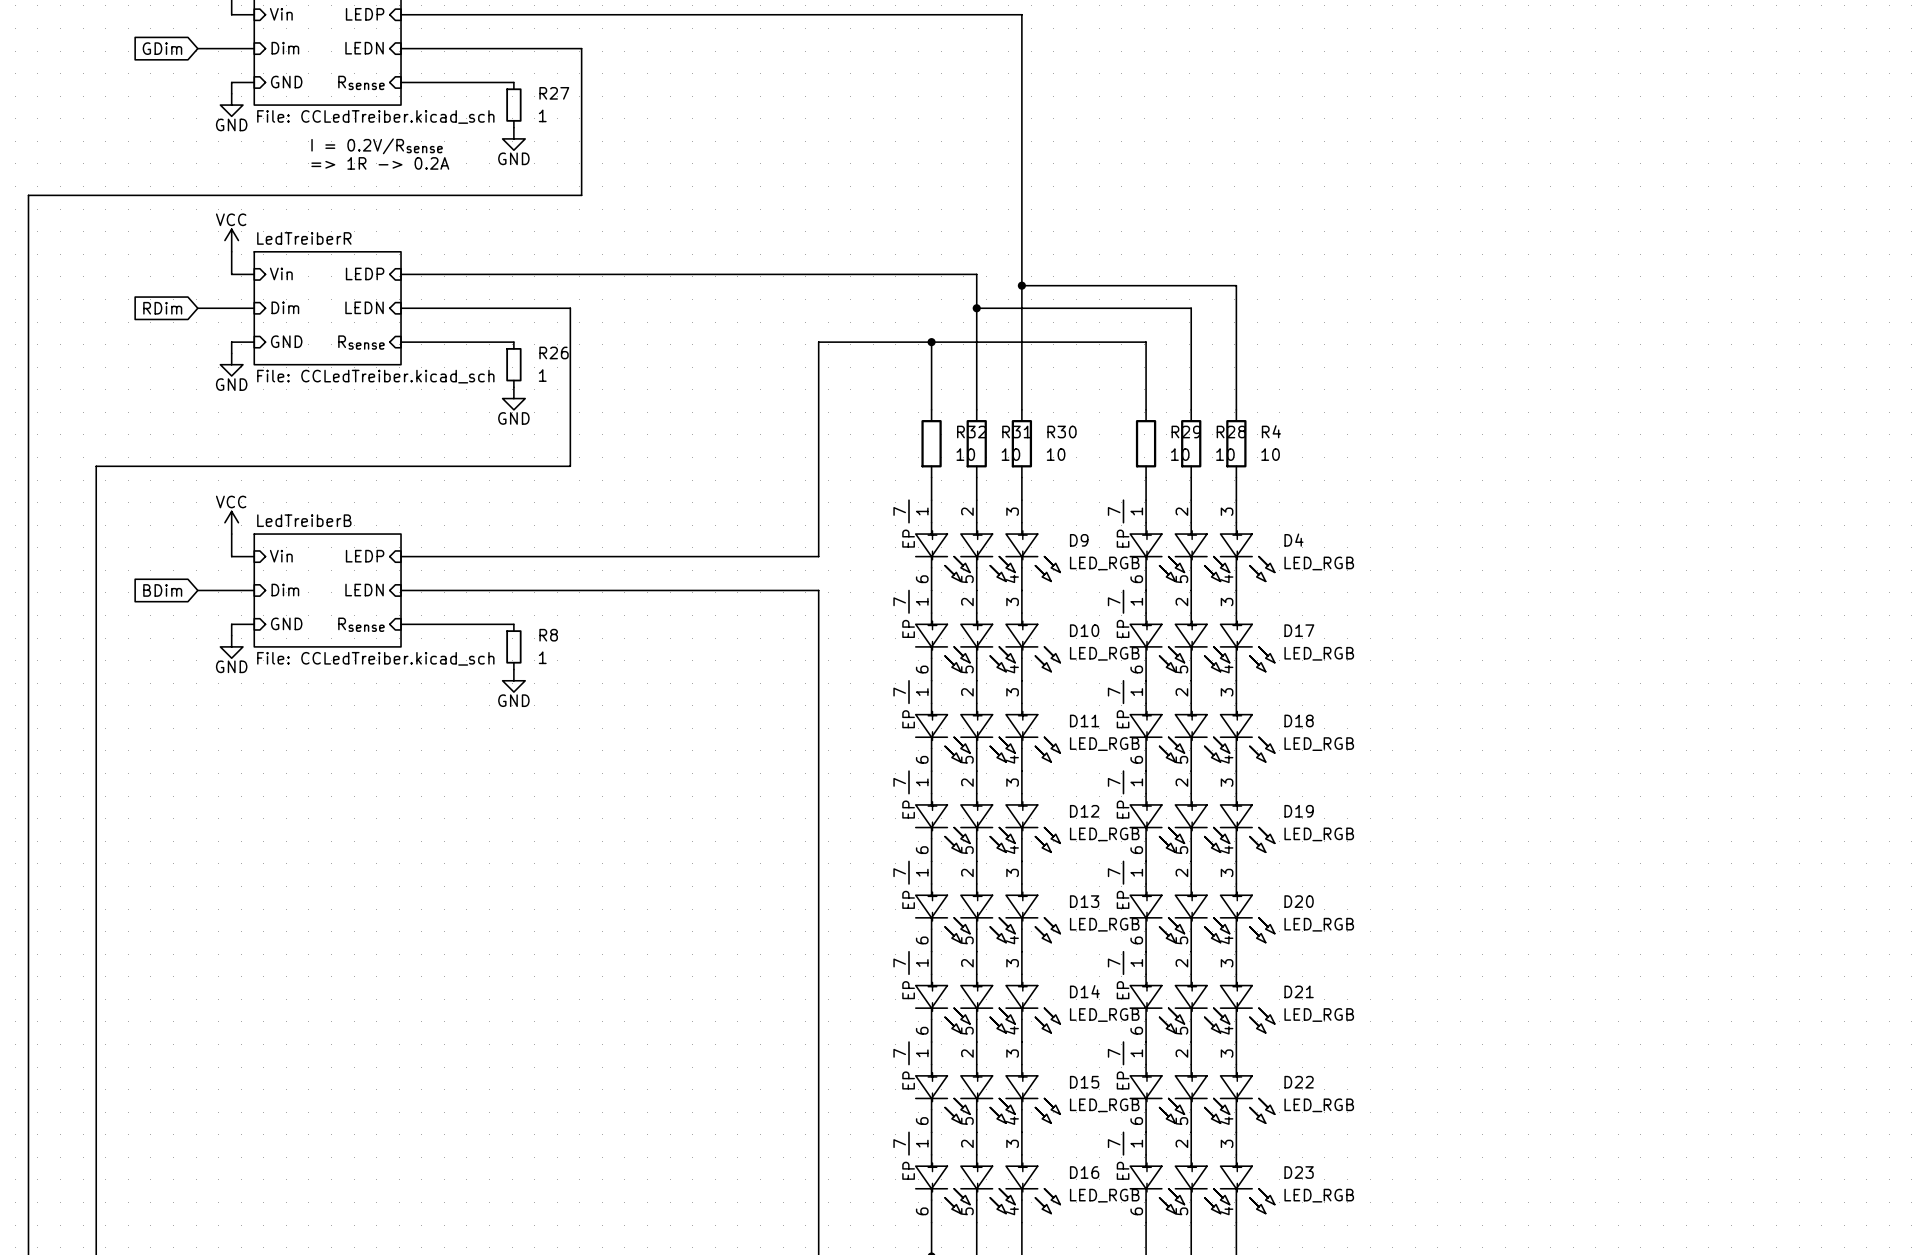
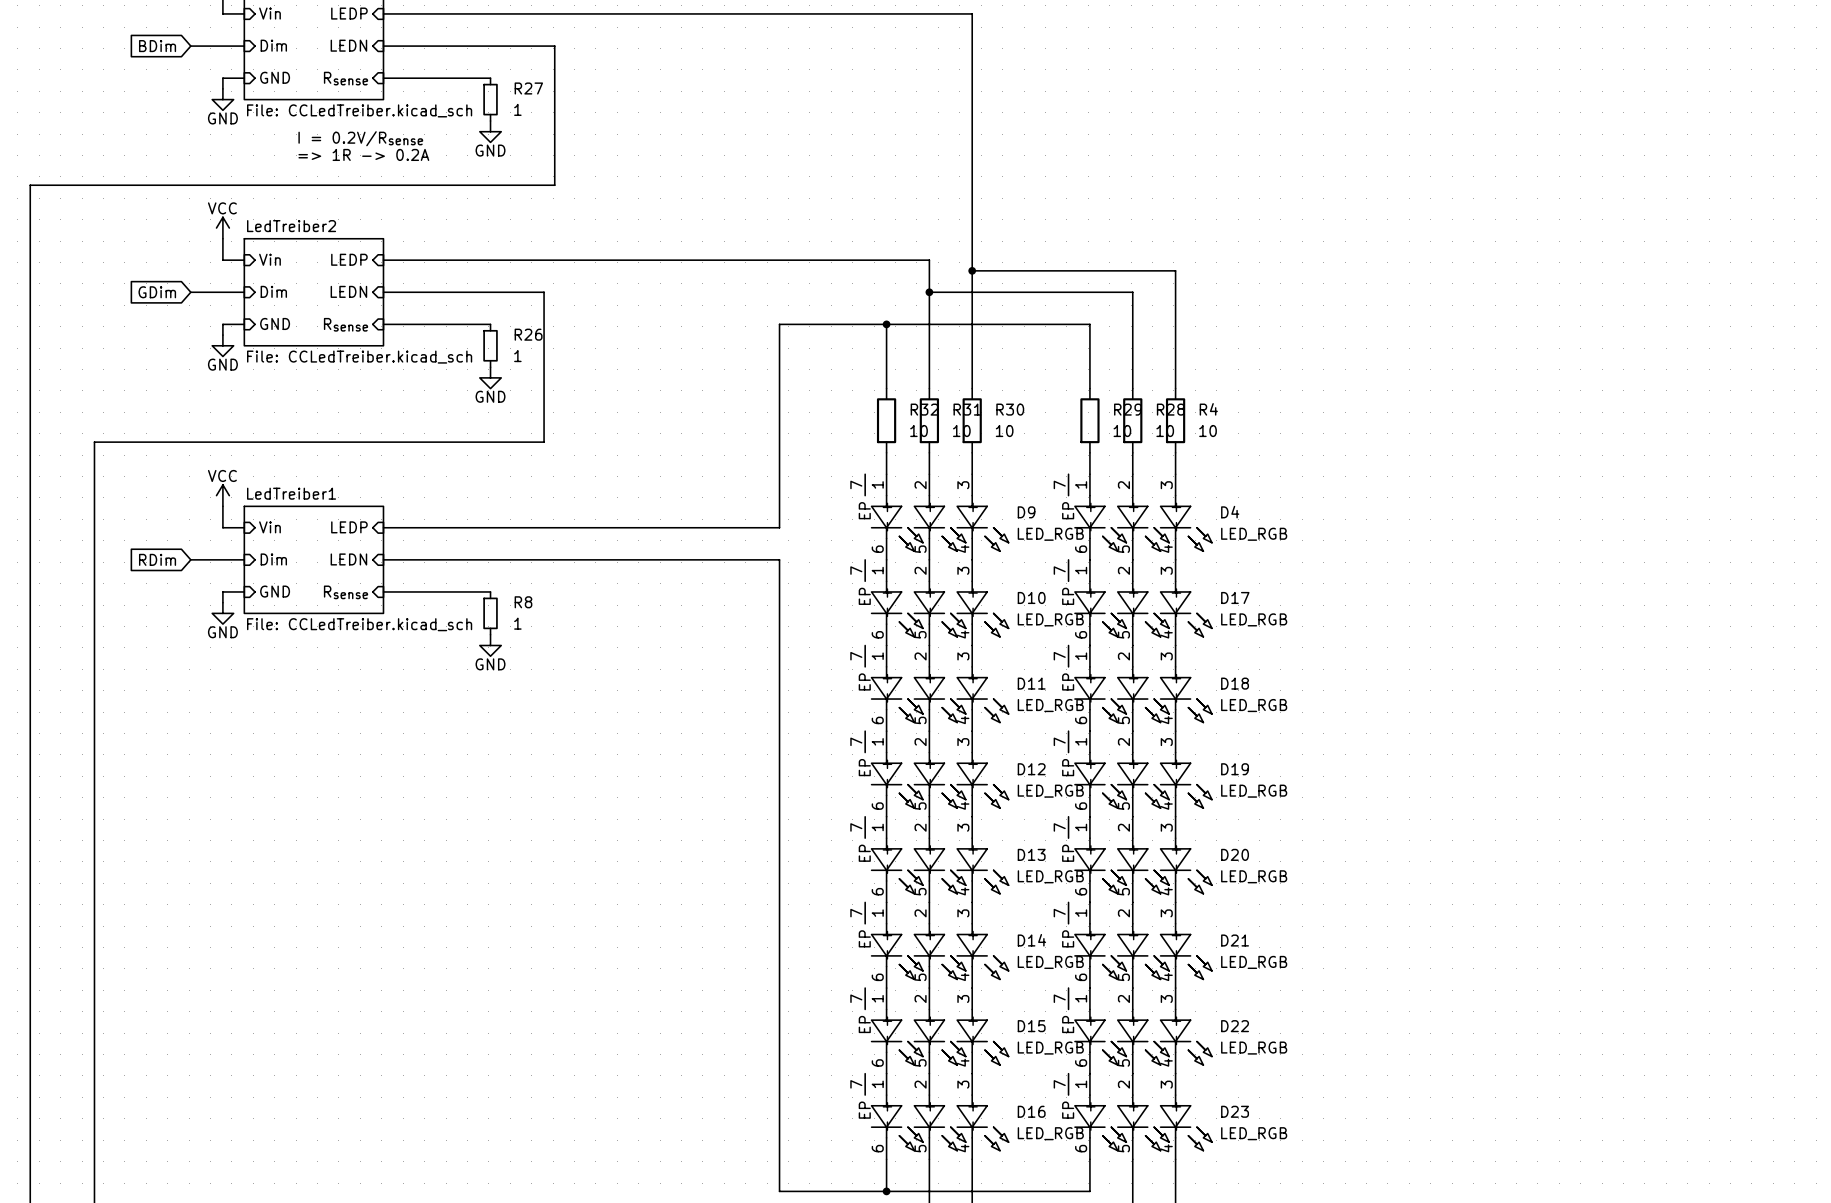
global label: GDim (162, 48) -> BDim (157, 46)
sheet LedTreiberR name: LedTreiberR (304, 238) -> LedTreiber2 (291, 226)
global label: RDim (162, 308) -> GDim (157, 292)
sheet LedTreiberB name: LedTreiberB (304, 520) -> LedTreiber1 (291, 493)
global label: BDim (162, 590) -> RDim (157, 559)

